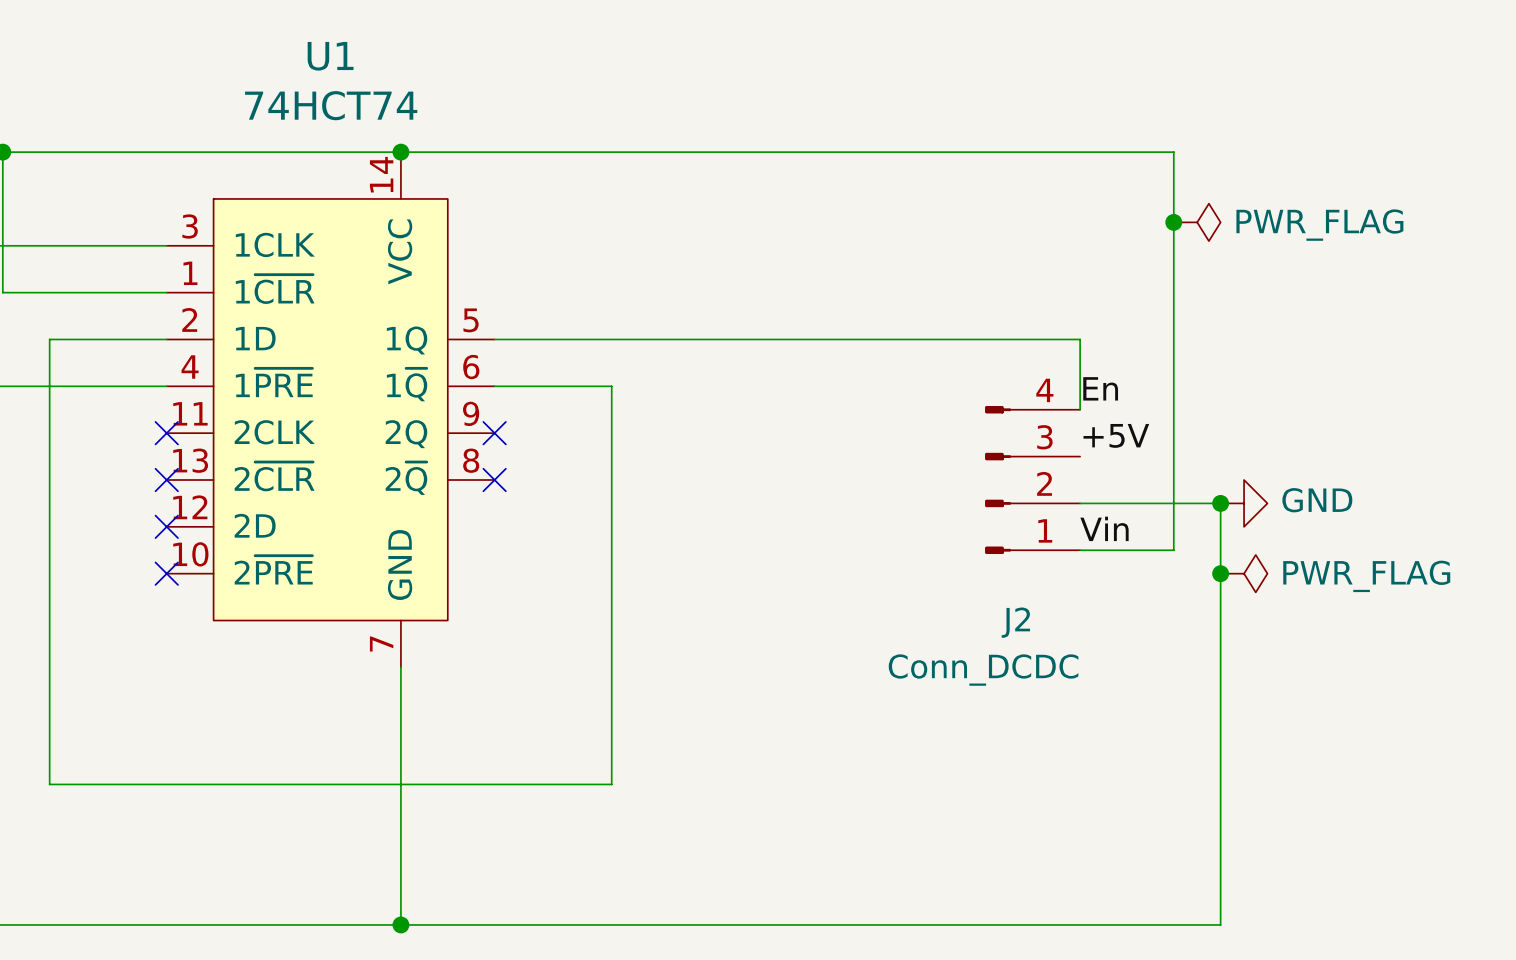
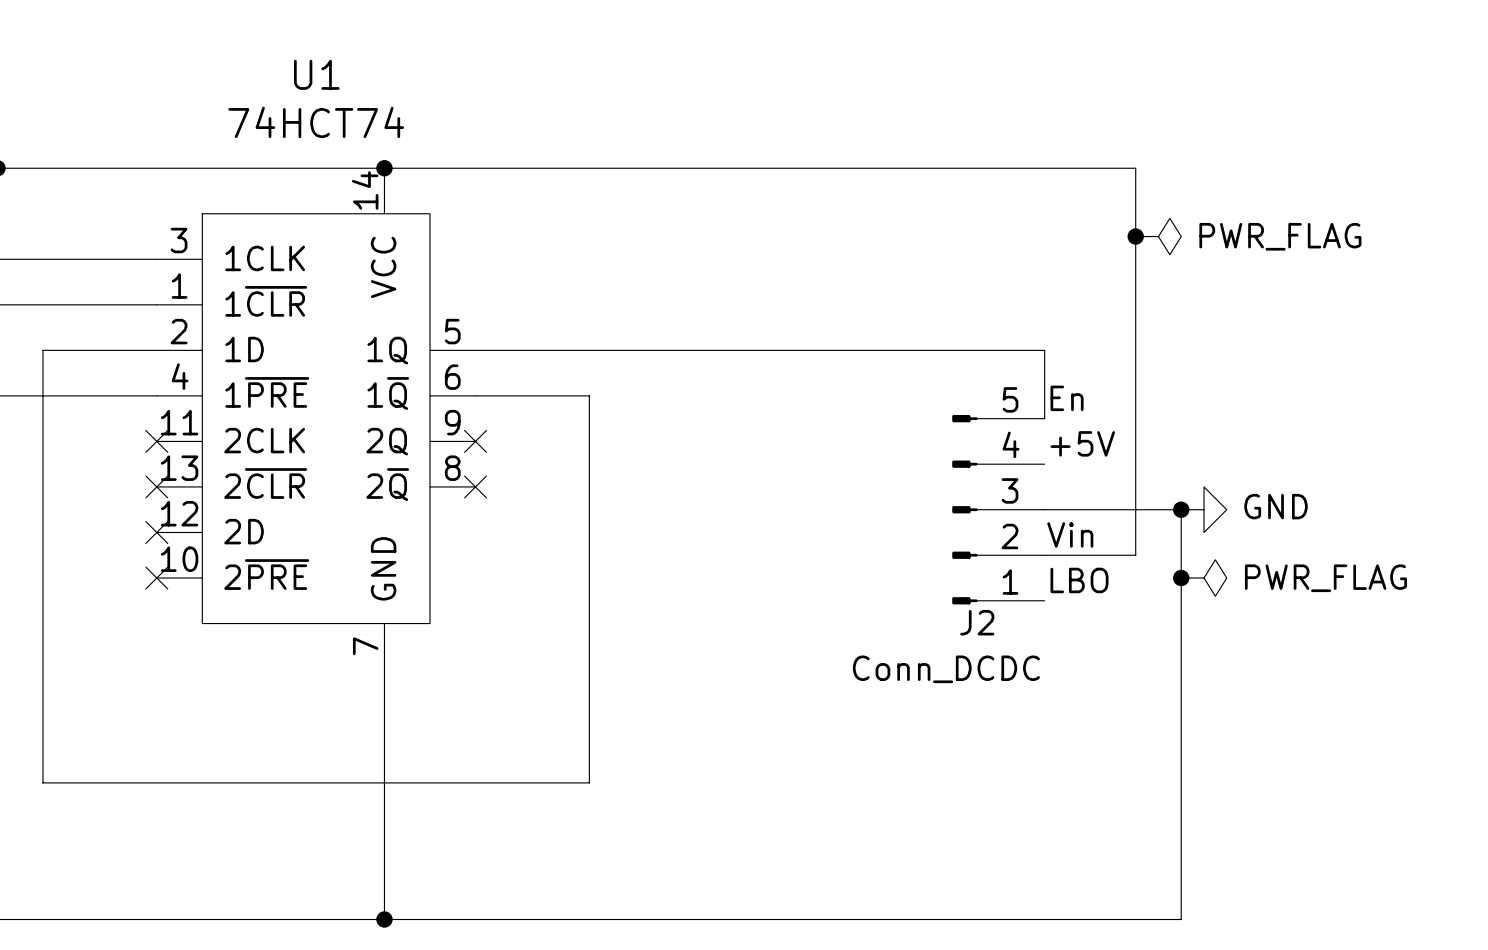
J2 symbol: [985, 405, 1081, 555] -> [952, 415, 1045, 605]
label: none -> LBO (1079, 580)

